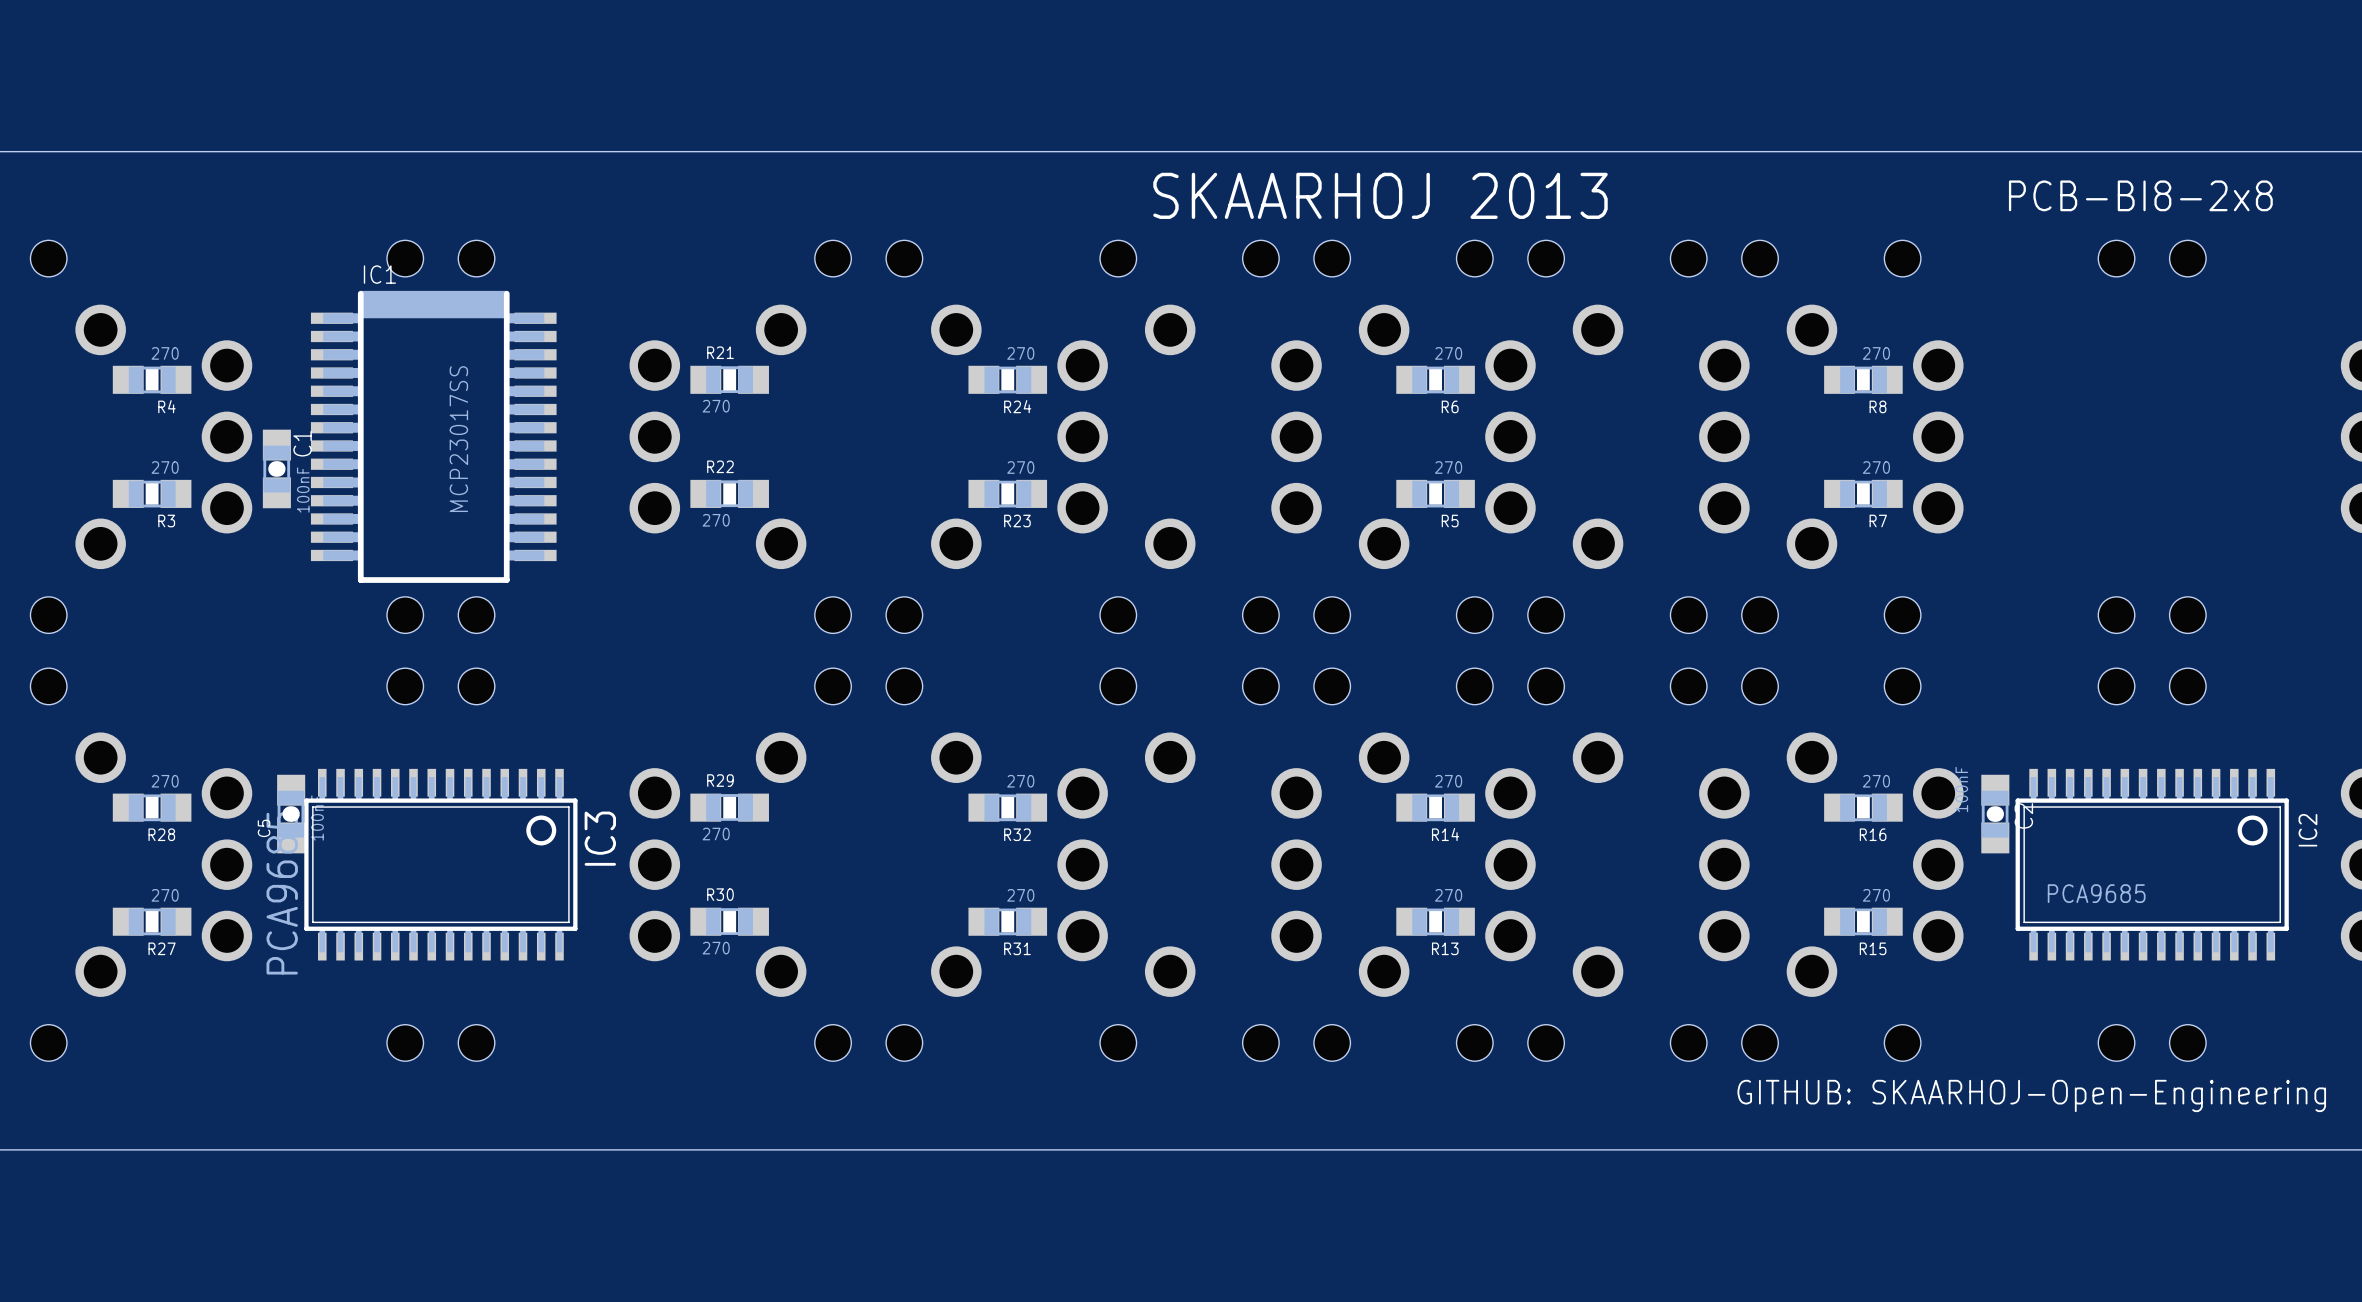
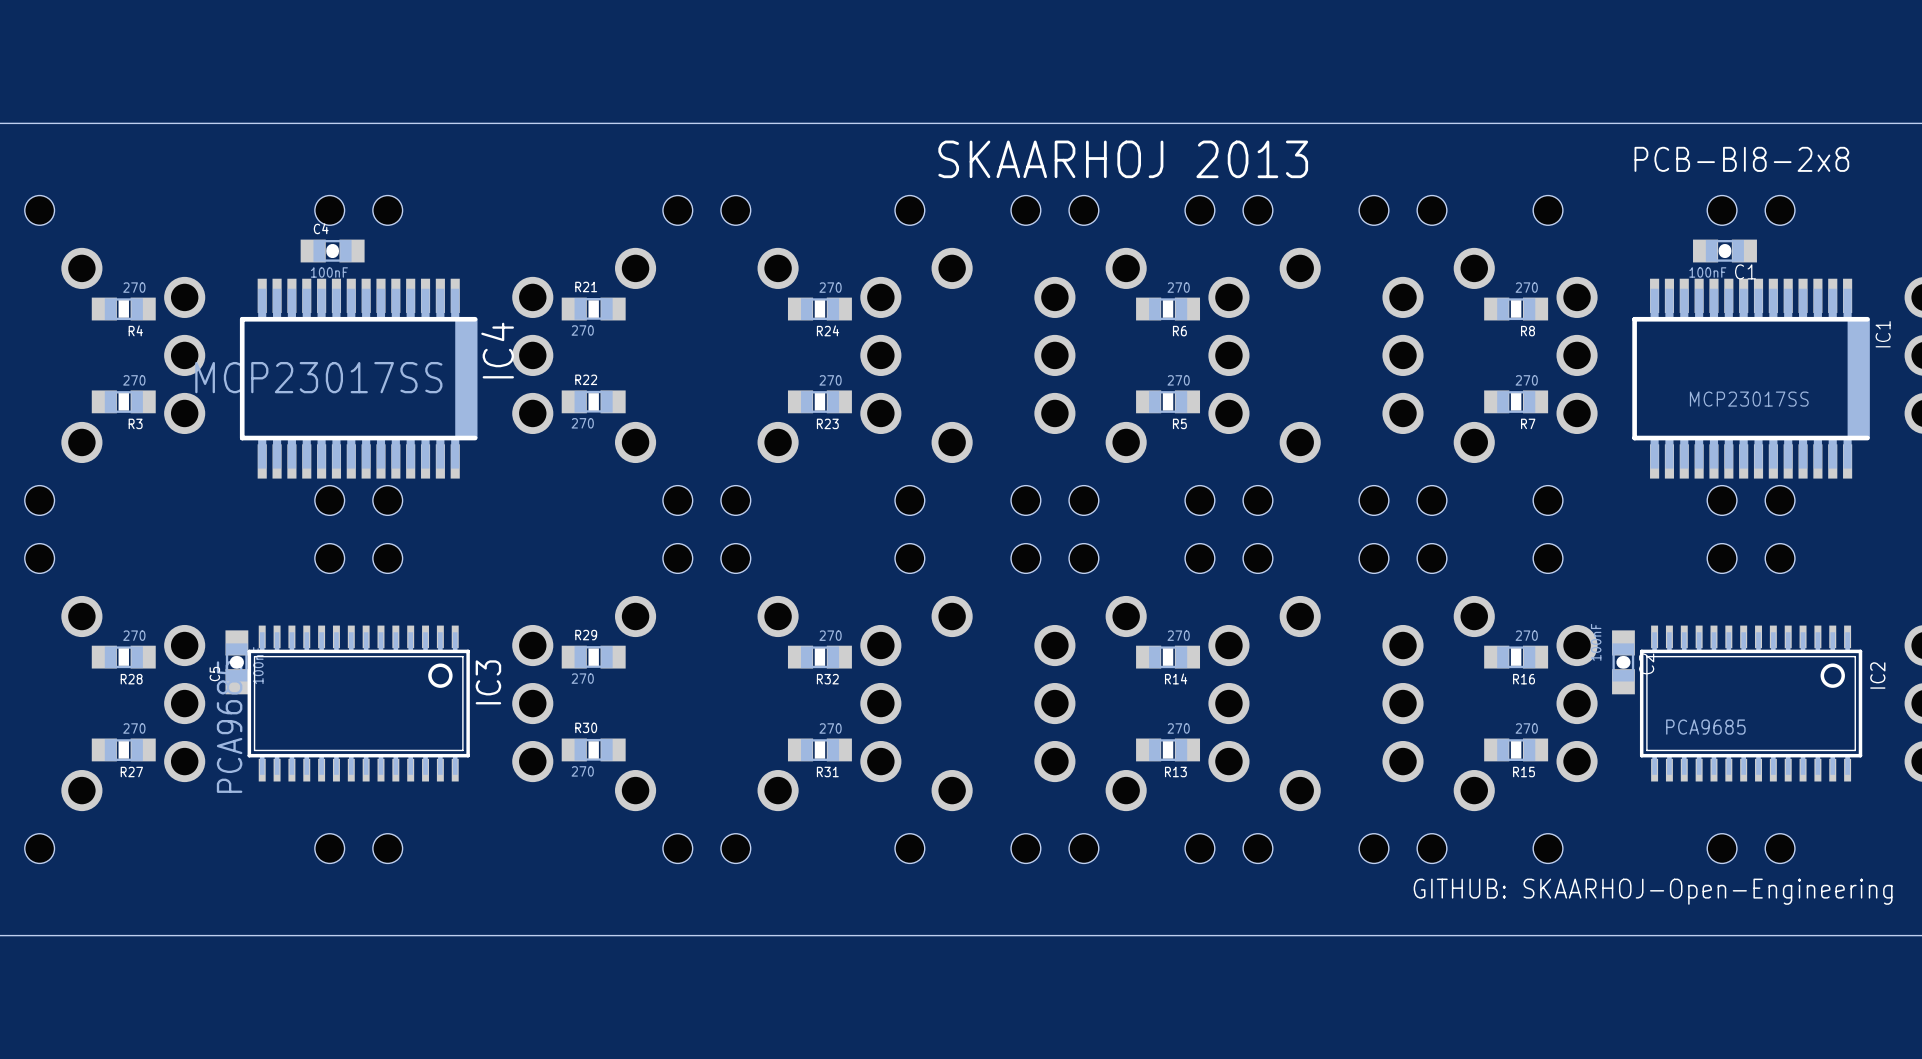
C4: none -> 100nF (332, 251)
IC1 rotation: 0° (433, 436) -> 90° clockwise (1751, 378)
IC1 position: (433, 436) -> (1751, 378)
IC4: none -> MCP23017SS (358, 378)
C1 rotation: 0° (276, 468) -> 90° clockwise (1724, 251)
C1 position: (276, 468) -> (1724, 251)

